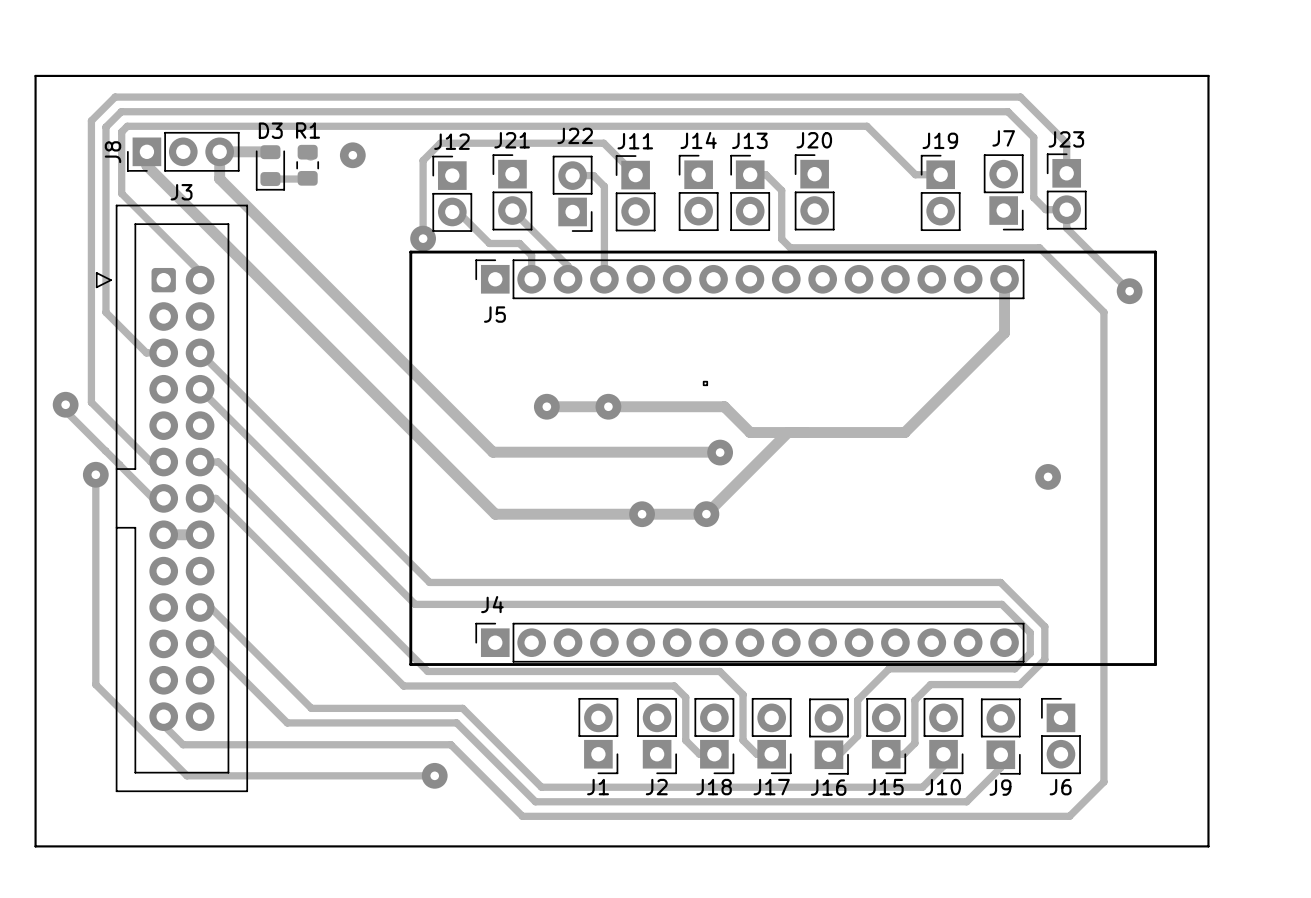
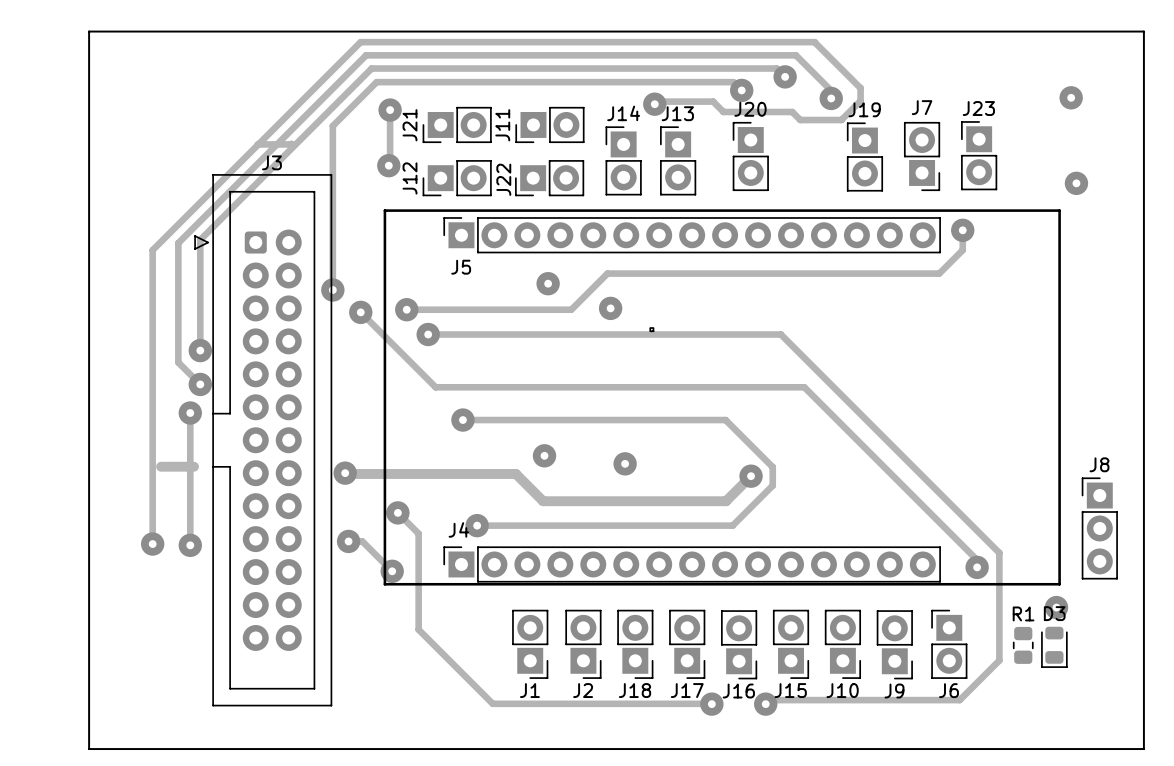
track: none -> (785, 76) (776, 68) (371, 68) (200, 239) (200, 350)
via: none -> (785, 76)
track: none -> (741, 90) (733, 82) (376, 82) (332, 125) (332, 290)
via: none -> (741, 90)
via: none -> (1071, 97)
track: none -> (831, 98) (831, 90) (795, 55) (366, 55) (178, 243) (178, 362) (200, 384)
via: none -> (831, 98)
track: none -> (654, 104) (657, 101) (713, 101) (723, 111) (792, 111) (800, 120) (841, 120) (860, 100) (860, 88) (814, 42) (360, 42) (152, 250) (152, 544)
via: none -> (654, 104)
J22 name position: J22 (575, 135) -> J22 (503, 179)
track: none -> (390, 110) (388, 165)
via: none -> (390, 110)
track: (146, 151) (146, 165) (495, 514) (706, 514) (788, 432) -> none
J8 rotation: 0° (183, 151) -> 90° clockwise (1099, 528)
J8 position: (183, 151) -> (1099, 528)
track: (270, 152) (219, 151) (219, 178) (492, 452) (720, 452) -> none
via: (352, 155) -> none
R1 position: (307, 165) -> (1023, 645)
D3 position: (270, 167) -> (1054, 647)
track: (1066, 173) (1066, 143) (1020, 97) (115, 97) (91, 120) (91, 402) (150, 462) (163, 462) -> none
track: (750, 174) (765, 174) (781, 190) (781, 239) (790, 247) (1039, 247) (1103, 312) (1103, 781) (1069, 816) (522, 816) (450, 744) (183, 744) (163, 725) (163, 716) -> none
track: (940, 174) (915, 174) (866, 126) (127, 126) (121, 131) (121, 193) (200, 271) (200, 280) -> none
track: (572, 175) (593, 175) (604, 186) (604, 279) -> none
track: (635, 175) (603, 143) (440, 143) (423, 160) (423, 238) -> none
J21 rotation: 0° (512, 192) -> 90° counterclockwise (457, 124)
J14 position: (698, 192) -> (623, 160)
J13 position: (750, 192) -> (678, 160)
J12 rotation: 0° (452, 193) -> 90° counterclockwise (457, 178)
J22 rotation: 0° (572, 193) -> 90° clockwise (549, 178)
J11 rotation: 0° (635, 193) -> 90° counterclockwise (549, 124)
J11 position: (635, 193) -> (549, 124)
track: (512, 210) (568, 266) (568, 279) -> none
track: (452, 211) (458, 211) (489, 243) (519, 243) (531, 255) (531, 279) -> none
via: none -> (1076, 183)
via position: (423, 238) -> (388, 165)
track: none -> (962, 230) (962, 250) (939, 273) (607, 273) (571, 309) (406, 309)
via: none -> (962, 230)
track: (1004, 279) (1004, 332) (904, 432) (750, 432) (724, 406) (546, 406) -> none
track: (1129, 291) (1066, 228) (1066, 209) (1045, 209) (1033, 197) (1033, 137) (1007, 111) (121, 111) (105, 127) (105, 312) (146, 352) (163, 352) -> none
via: (1129, 291) -> none
via: none -> (548, 283)
via: none -> (332, 290)
track: (200, 352) (429, 582) (1000, 582) (1044, 626) (1044, 659) (1019, 684) (930, 684) (914, 700) (914, 743) (903, 754) (886, 754) -> none
via: none -> (610, 308)
via: none -> (406, 309)
track: none -> (360, 312) (435, 387) (804, 387) (977, 560) (977, 567)
via: none -> (360, 312)
track: none -> (428, 334) (780, 334) (999, 552) (999, 660) (959, 700) (769, 700) (765, 704)
via: none -> (428, 334)
track: (200, 389) (415, 604) (1001, 604) (1030, 632) (1030, 653) (1014, 668) (889, 668) (857, 700) (857, 736) (838, 754) (828, 754) -> none
track: (65, 404) (65, 411) (105, 450) -> none
via: (65, 404) -> none
via: none -> (200, 350)
via: (546, 406) -> none
via: (608, 406) -> none
via: none -> (200, 384)
track: (105, 450) (119, 464) -> none
via: (720, 452) -> none
track: (200, 462) (218, 462) (427, 671) (719, 671) (743, 694) (743, 740) (756, 754) (771, 754) -> none
track: (119, 465) (153, 498) (163, 498) -> none
track: (95, 474) (95, 684) (186, 775) (434, 775) -> none
via: (95, 474) -> none
track: none -> (190, 413) (190, 545)
via: none -> (190, 413)
via: (1048, 476) -> none
track: none -> (462, 420) (725, 420) (772, 467) (772, 485) (732, 525) (477, 525)
via: none -> (462, 420)
J3 position: (171, 498) -> (263, 440)
track: (200, 498) (216, 498) (403, 686) (674, 686) (685, 697) (685, 740) (699, 754) (714, 754) -> none
via: (642, 514) -> none
via: (706, 514) -> none
via: none -> (544, 455)
via: none -> (625, 463)
track: none -> (345, 473) (515, 473) (543, 501) (726, 501) (751, 476)
via: none -> (345, 473)
via: none -> (751, 476)
track: none -> (397, 512) (418, 533) (418, 629) (492, 703) (711, 704)
via: none -> (397, 512)
via: none -> (477, 525)
track: (200, 607) (210, 607) (311, 708) (462, 708) (541, 787) (922, 787) (943, 766) (943, 754) -> none
track: none -> (348, 541) (362, 541) (392, 571)
via: none -> (348, 541)
via: none -> (152, 544)
via: none -> (190, 545)
track: (200, 643) (208, 643) (287, 722) (456, 722) (535, 801) (966, 801) (1000, 767) (1000, 754) -> none
via: none -> (977, 567)
via: none -> (392, 571)
via: none -> (1056, 607)
J1 position: (598, 736) -> (530, 644)
J2 position: (657, 736) -> (583, 644)
J18 position: (714, 736) -> (635, 644)
J17 position: (771, 736) -> (687, 644)
J16 position: (828, 736) -> (739, 644)
J15 position: (886, 736) -> (791, 644)
J10 position: (943, 736) -> (842, 644)
J9 position: (1000, 736) -> (894, 644)
J6 position: (1060, 736) -> (949, 644)
via: (434, 775) -> none
via: none -> (711, 704)
via: none -> (765, 704)
board edge: (84, 846) (35, 846) (35, 75) (1208, 75) (1208, 846) -> (89, 749) (89, 31) (1143, 31) (1143, 749) (1107, 749)

